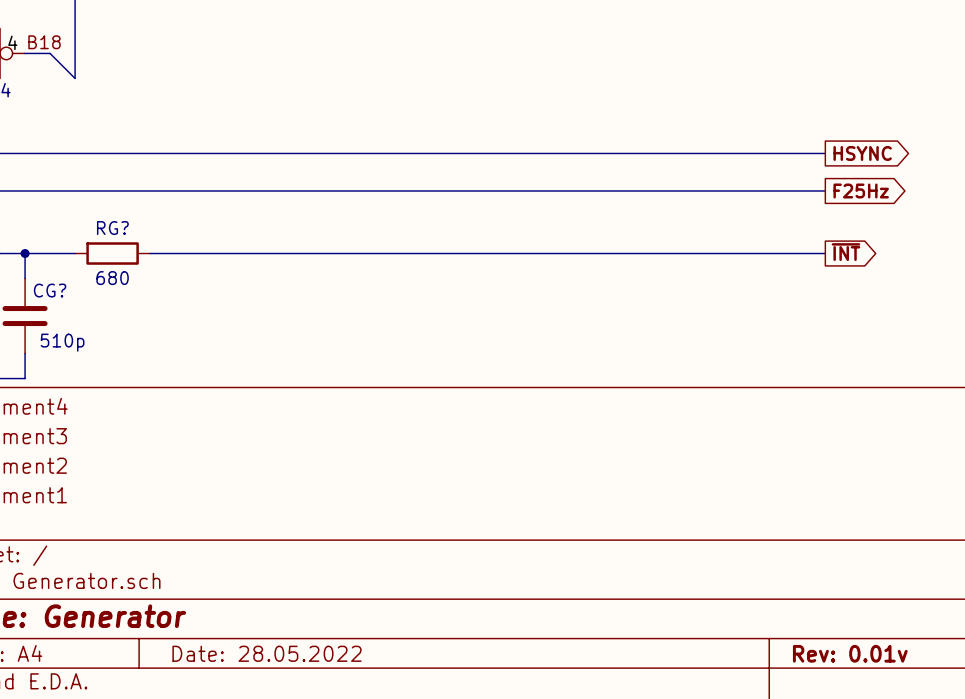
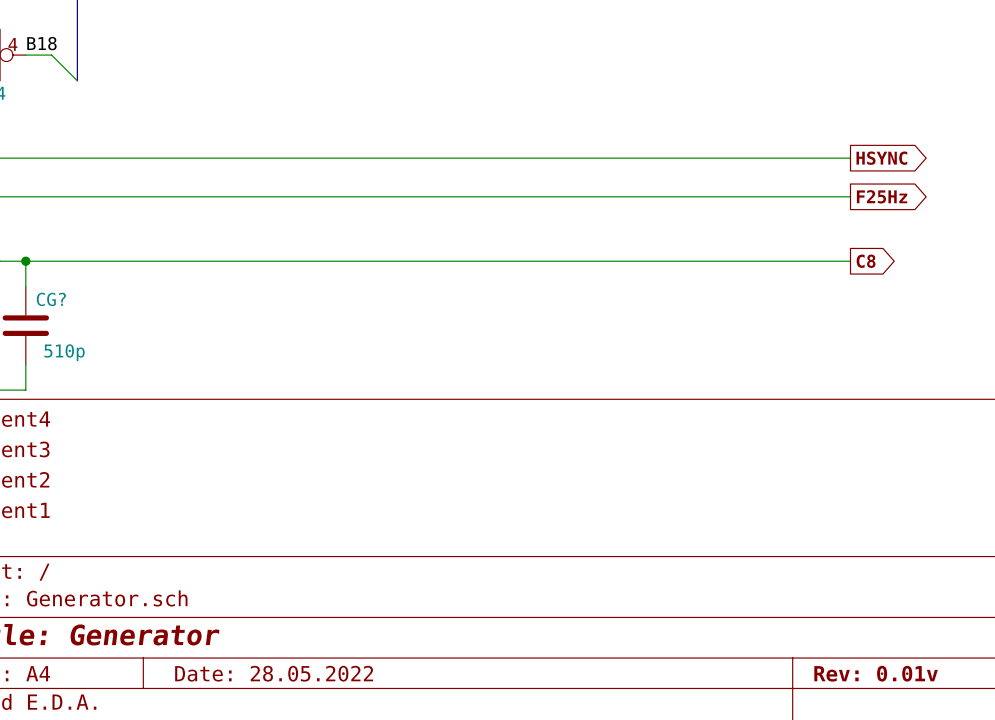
global label: ~{INT} (846, 252) -> C8 (866, 261)
wire: none -> (77, 261) (154, 261)
RG?: 680 (112, 253) -> none

